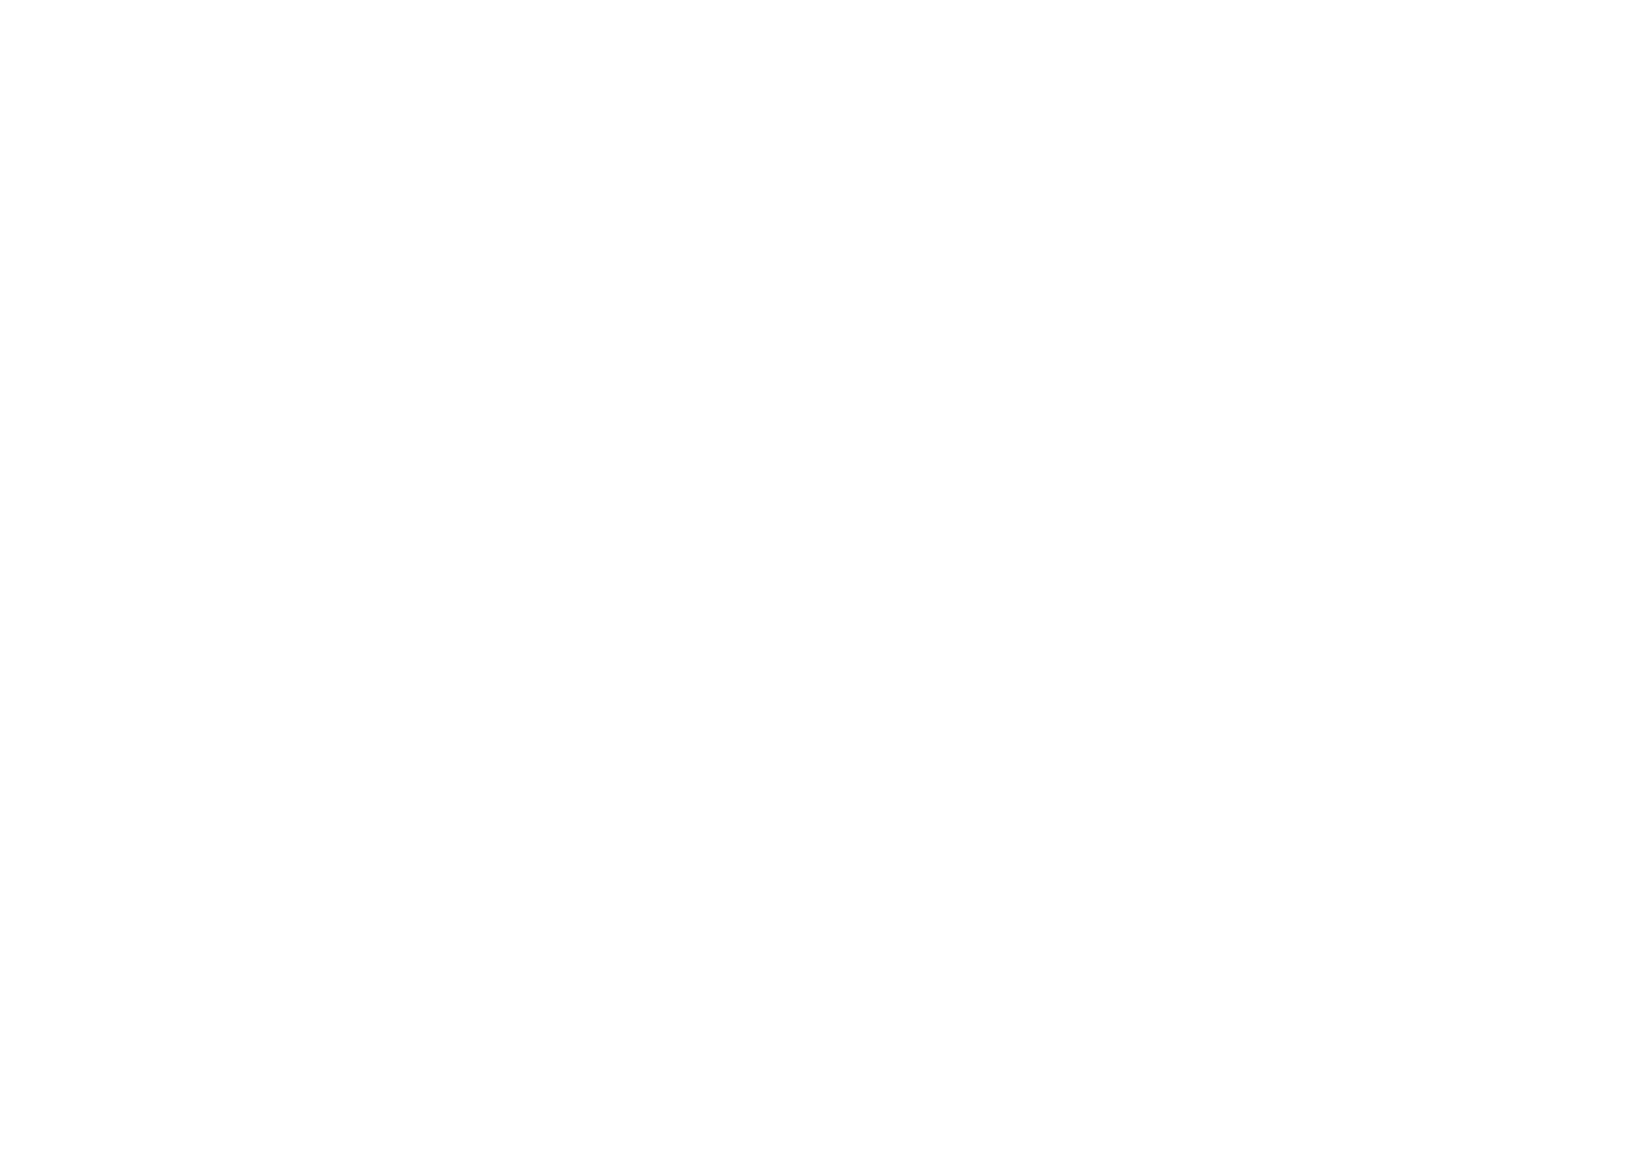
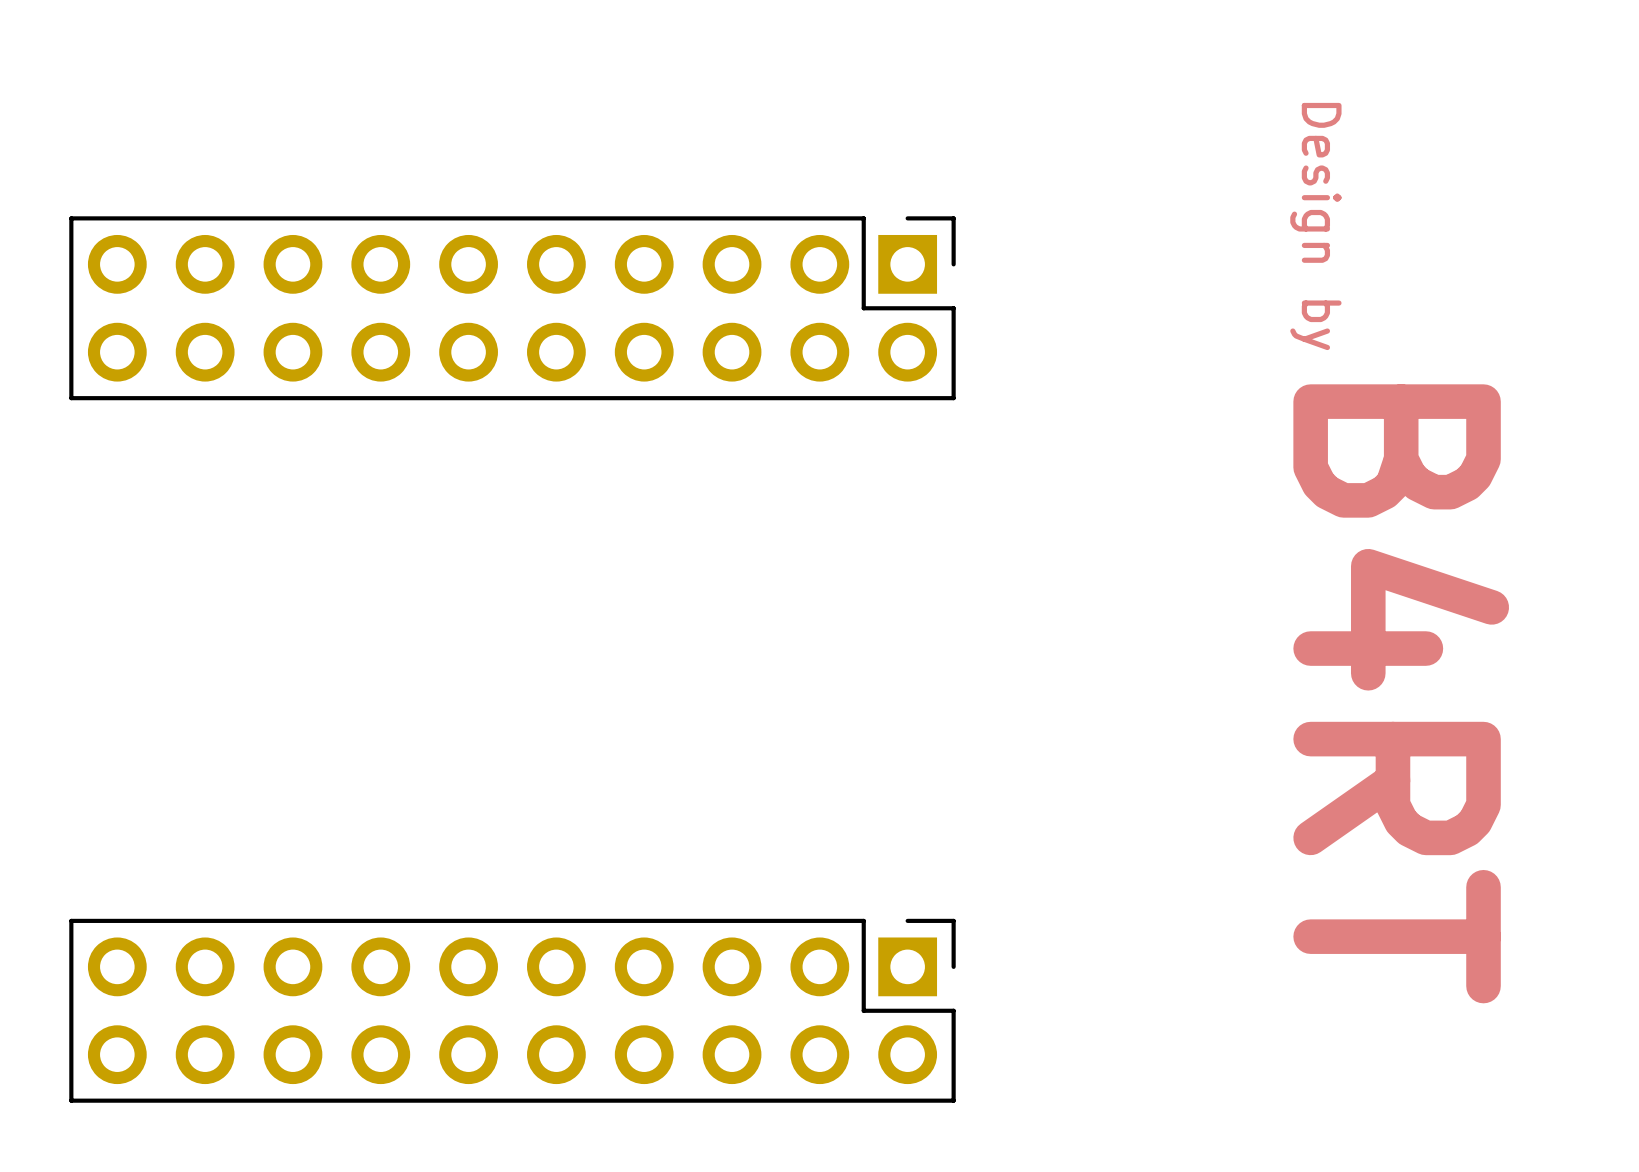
text: none -> Design by (1315, 226)
part: none -> (512, 308)
text: none -> B4RT (1401, 693)
part: none -> (512, 1010)

